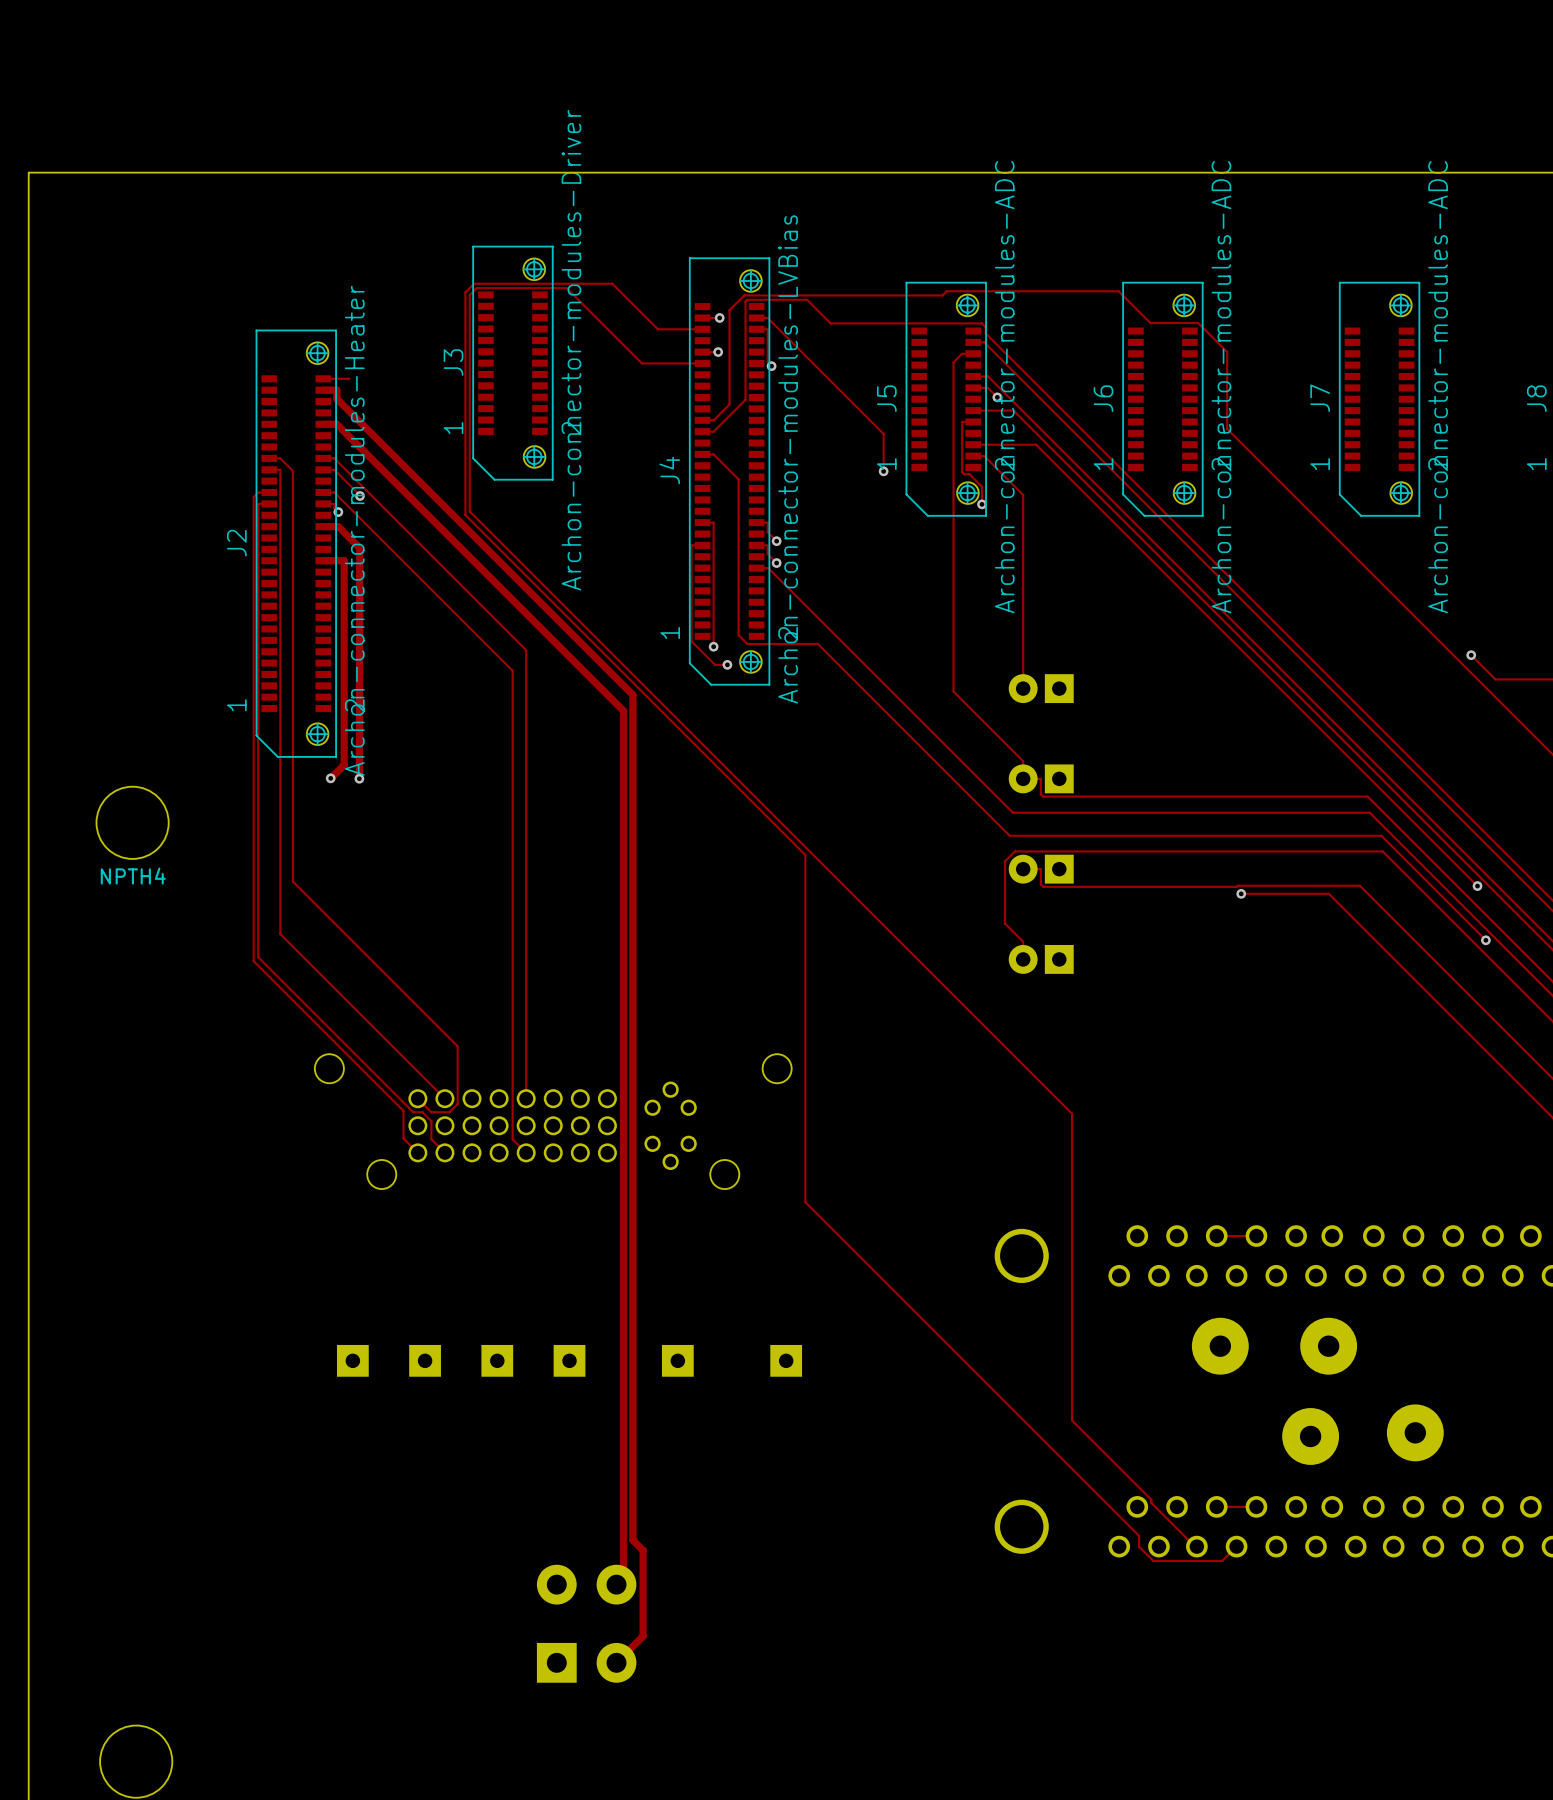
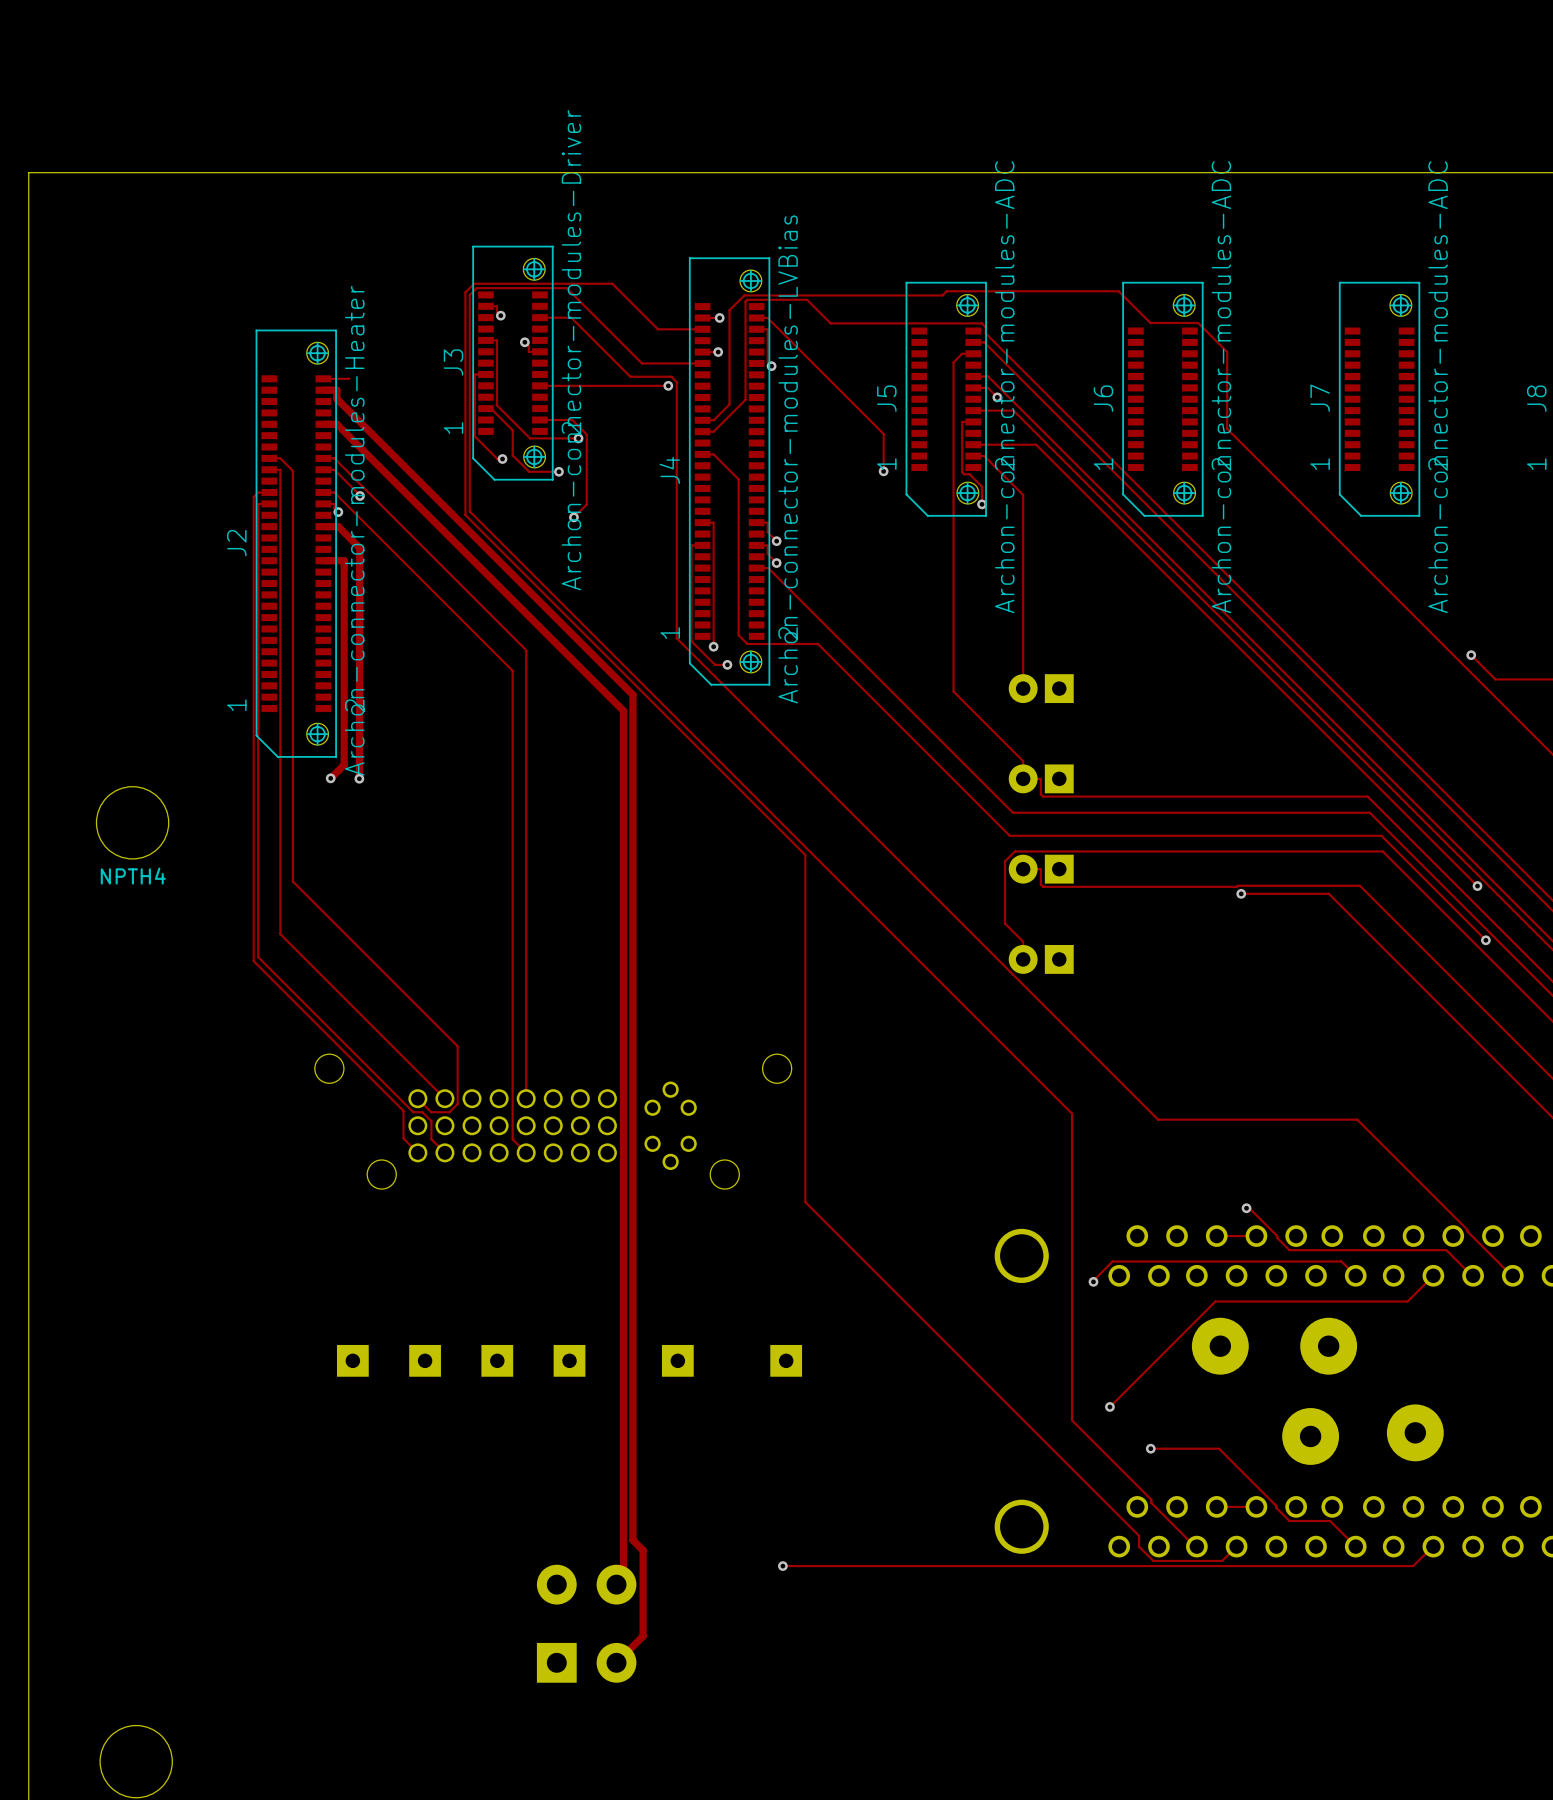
track: none -> (485, 306) (496, 306) (496, 311) (500, 315)
via: none -> (500, 315)
track: none -> (539, 317) (571, 317) (630, 376) (671, 376) (676, 382) (676, 638) (1158, 1119) (1357, 1119) (1511, 1275)
track: none -> (485, 340) (496, 340) (496, 405) (530, 438) (578, 438)
track: none -> (524, 342) (528, 346) (528, 351) (539, 351)
via: none -> (524, 342)
track: none -> (485, 374) (474, 374) (474, 436) (497, 459) (502, 459)
track: none -> (539, 385) (668, 385)
via: none -> (668, 385)
track: none -> (485, 408) (491, 408) (512, 430) (512, 455) (529, 471) (558, 471)
track: none -> (539, 419) (572, 419) (586, 434) (586, 504) (573, 517)
via: none -> (578, 438)
via: none -> (502, 459)
via: none -> (558, 471)
via: none -> (573, 517)
track: none -> (1246, 1208) (1249, 1208) (1289, 1250) (1446, 1250) (1471, 1275)
via: none -> (1246, 1208)
track: none -> (1355, 1275) (1341, 1261) (1112, 1261) (1093, 1281)
track: none -> (1433, 1275) (1407, 1301) (1215, 1301) (1109, 1406)
via: none -> (1093, 1281)
via: none -> (1109, 1406)
track: none -> (1150, 1448) (1219, 1448) (1289, 1520) (1330, 1520) (1355, 1546)
via: none -> (1150, 1448)
track: none -> (1432, 1546) (1413, 1566) (782, 1566)
via: none -> (782, 1566)

